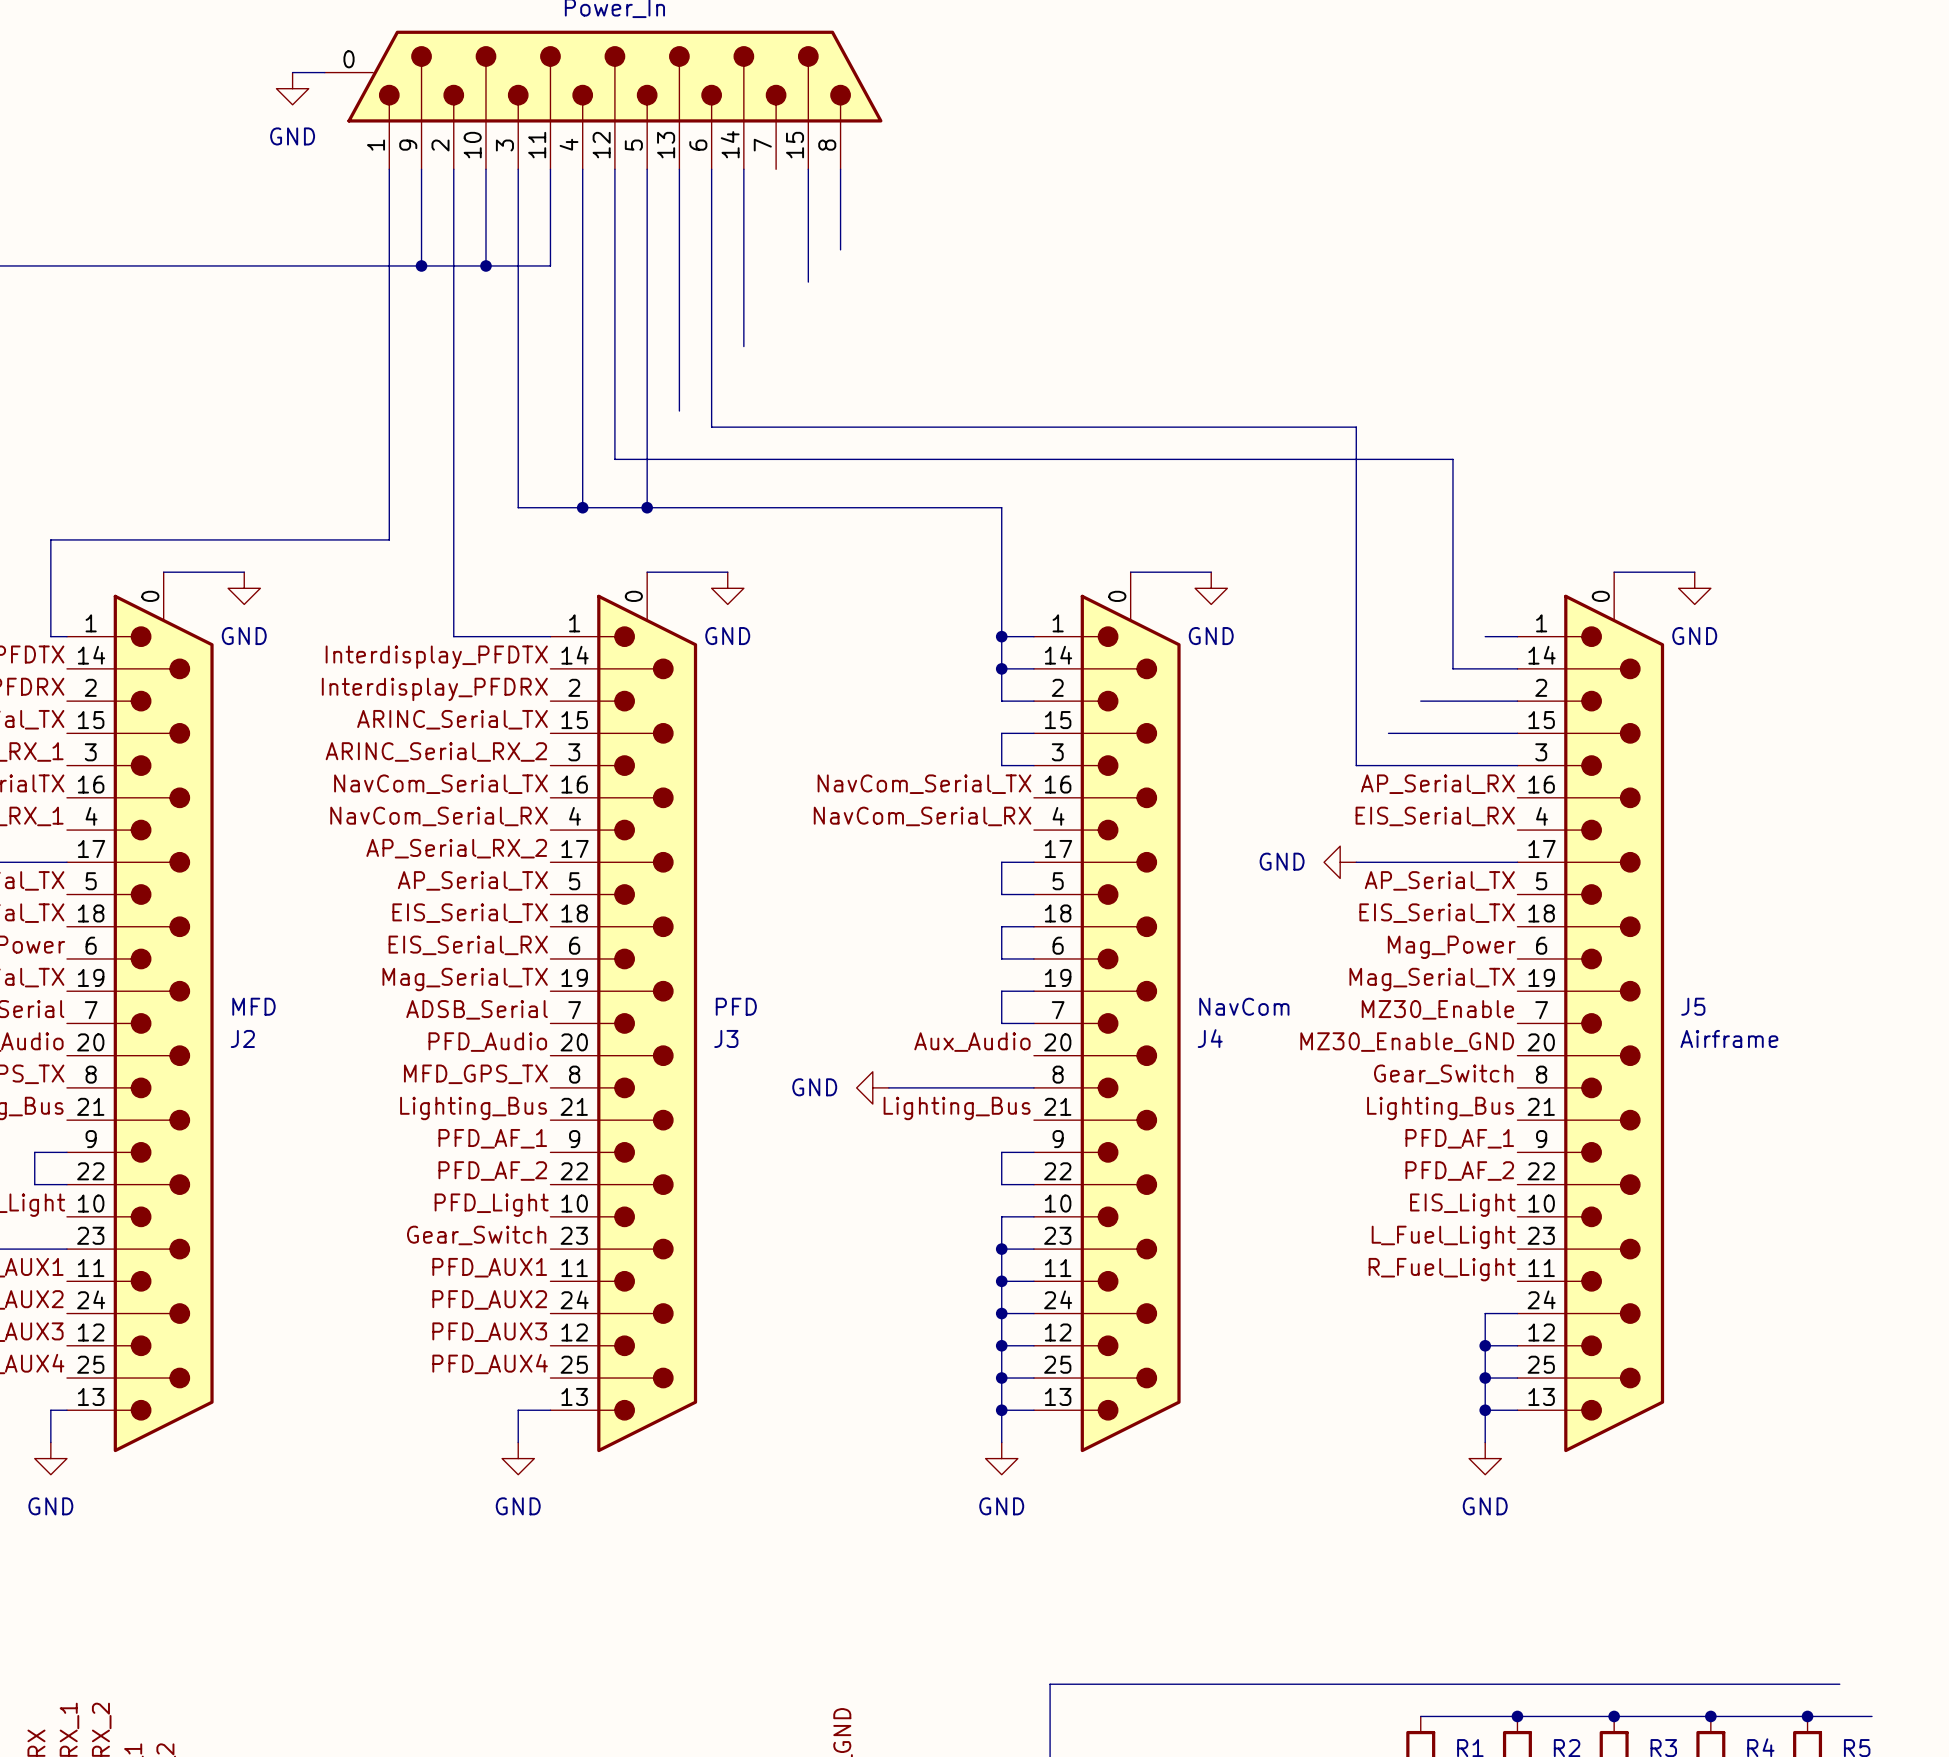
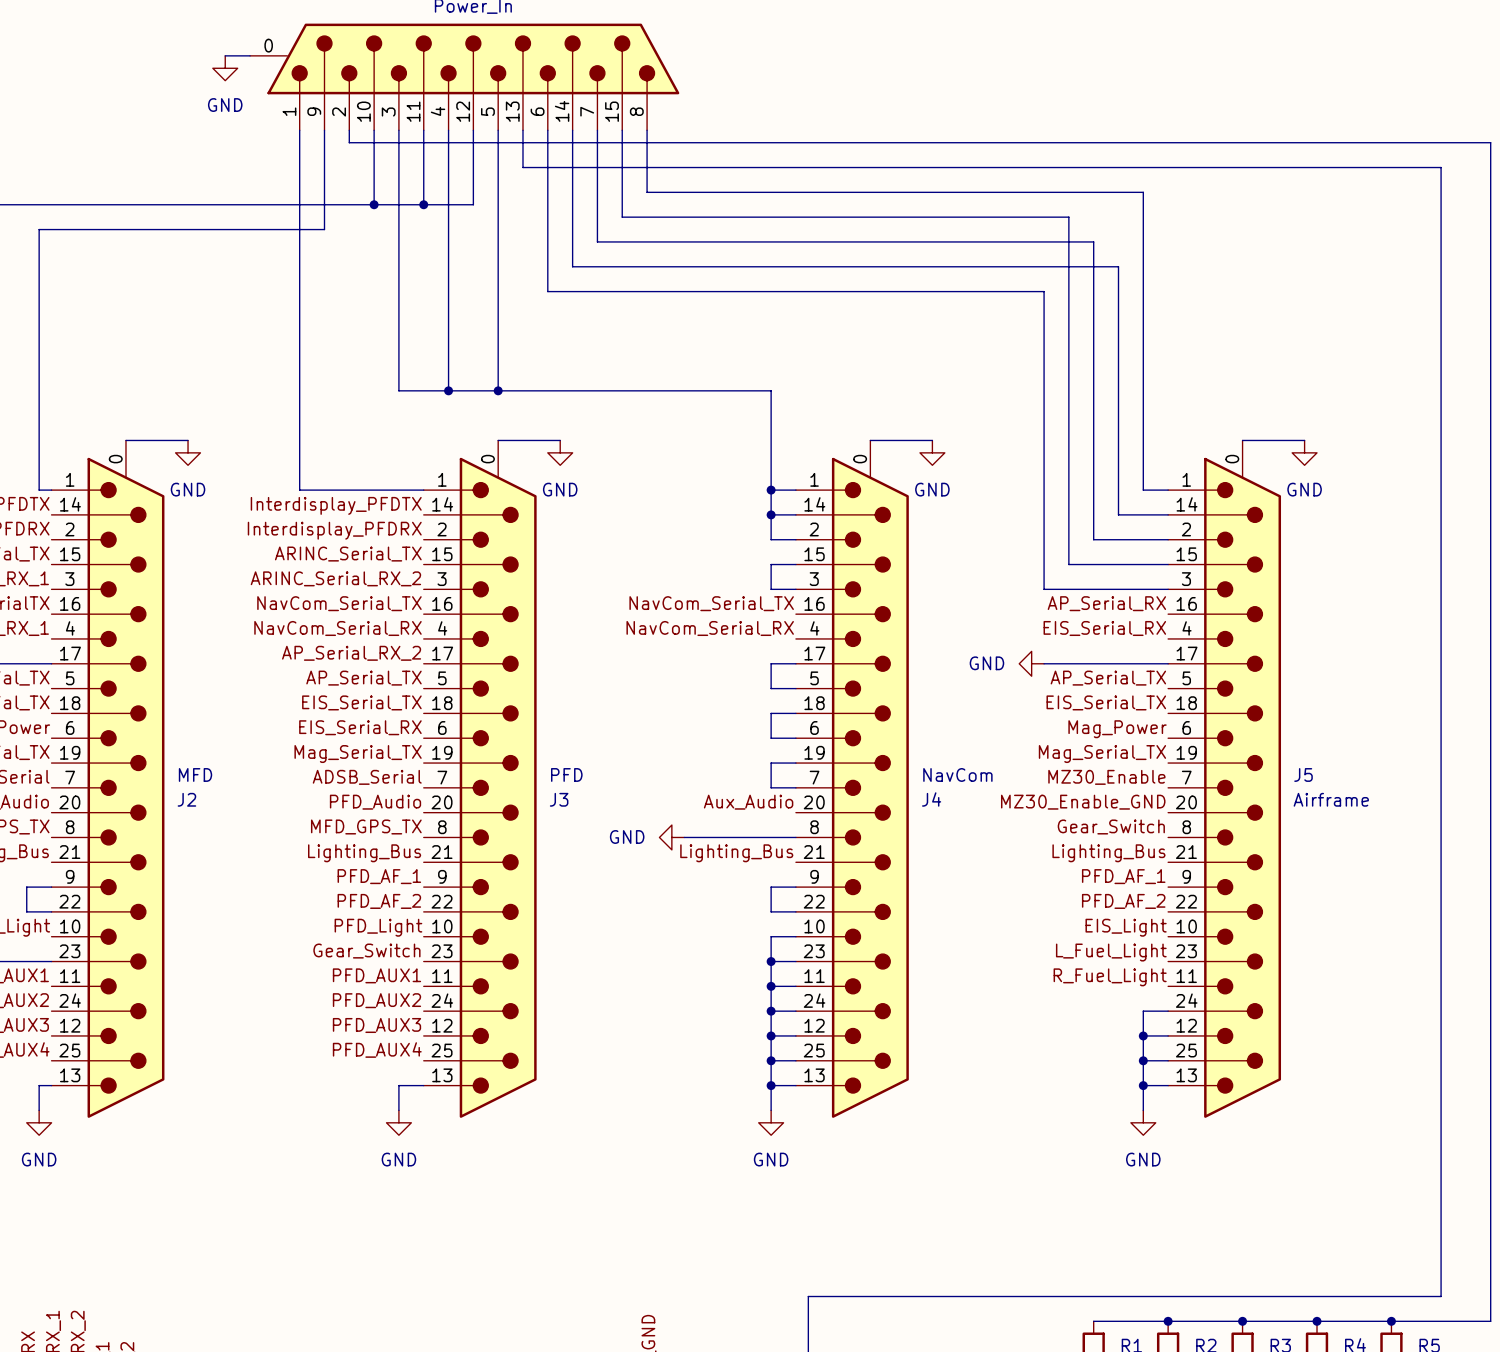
wire: none -> (597, 130) (597, 241) (1093, 241) (1093, 539)
wire: (453, 185) (453, 636) -> (299, 415) (299, 490) (349, 490)
wire: none -> (349, 142) (1490, 142) (1490, 1321) (1441, 1321)
wire: (679, 217) (679, 411) -> (522, 167) (1441, 167) (1441, 1296) (1416, 1296)
wire: none -> (647, 192) (1143, 192) (1143, 490)
junction: (421, 265) -> none
wire: none -> (423, 204) (473, 204)
junction: none -> (423, 204)
wire: (614, 265) (614, 459) (1452, 459) -> (572, 266) (1118, 266) (1118, 353)
wire: none -> (622, 217) (1068, 217) (1068, 564)
wire: (711, 378) (711, 427) (1356, 427) -> (547, 291) (1044, 291) (1044, 328)
wire: (50, 539) (389, 539) -> (39, 415) (39, 229) (324, 229) (324, 204)

